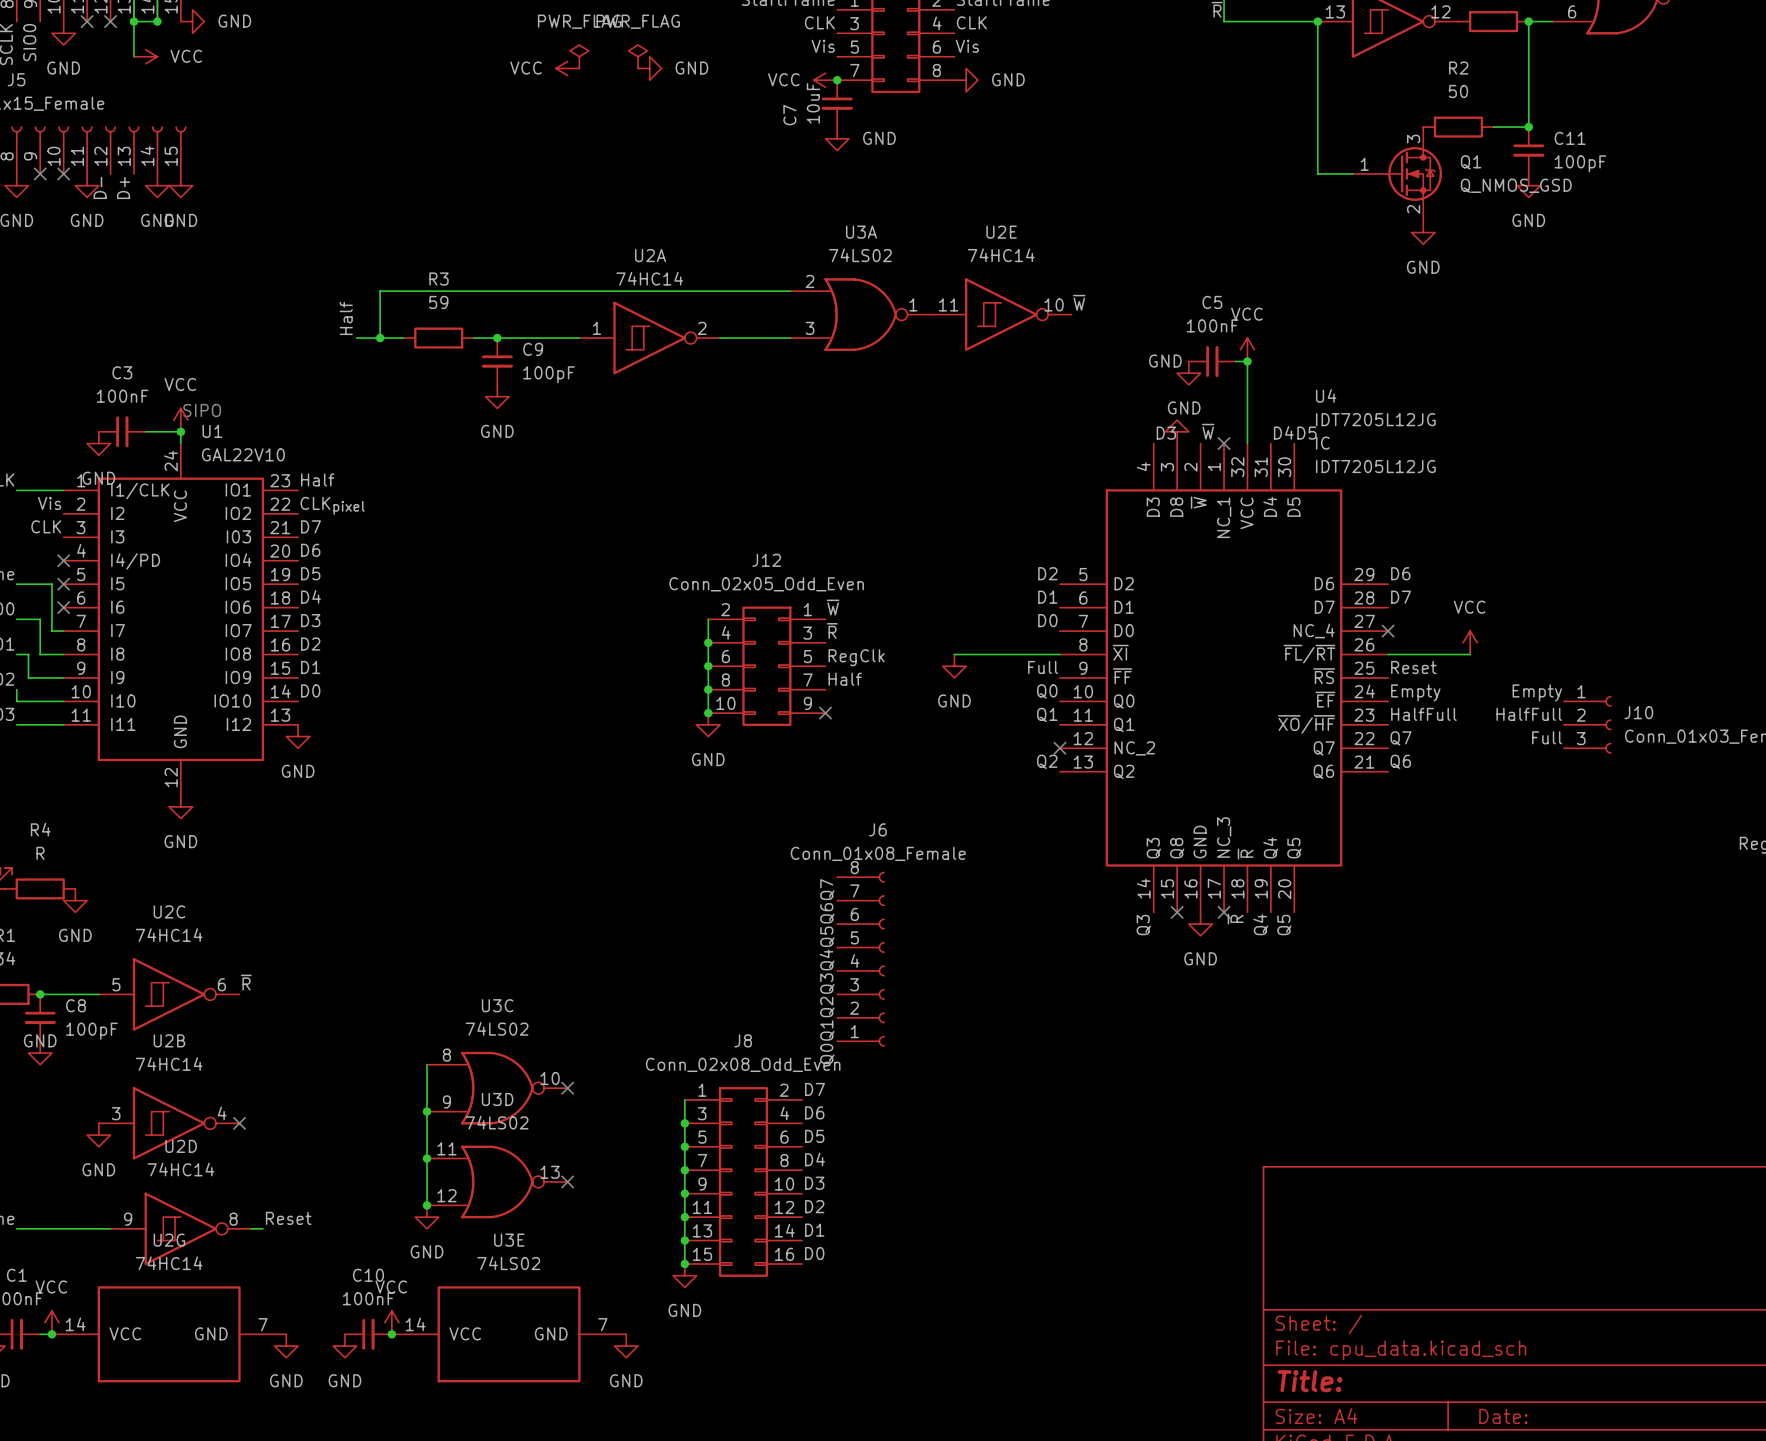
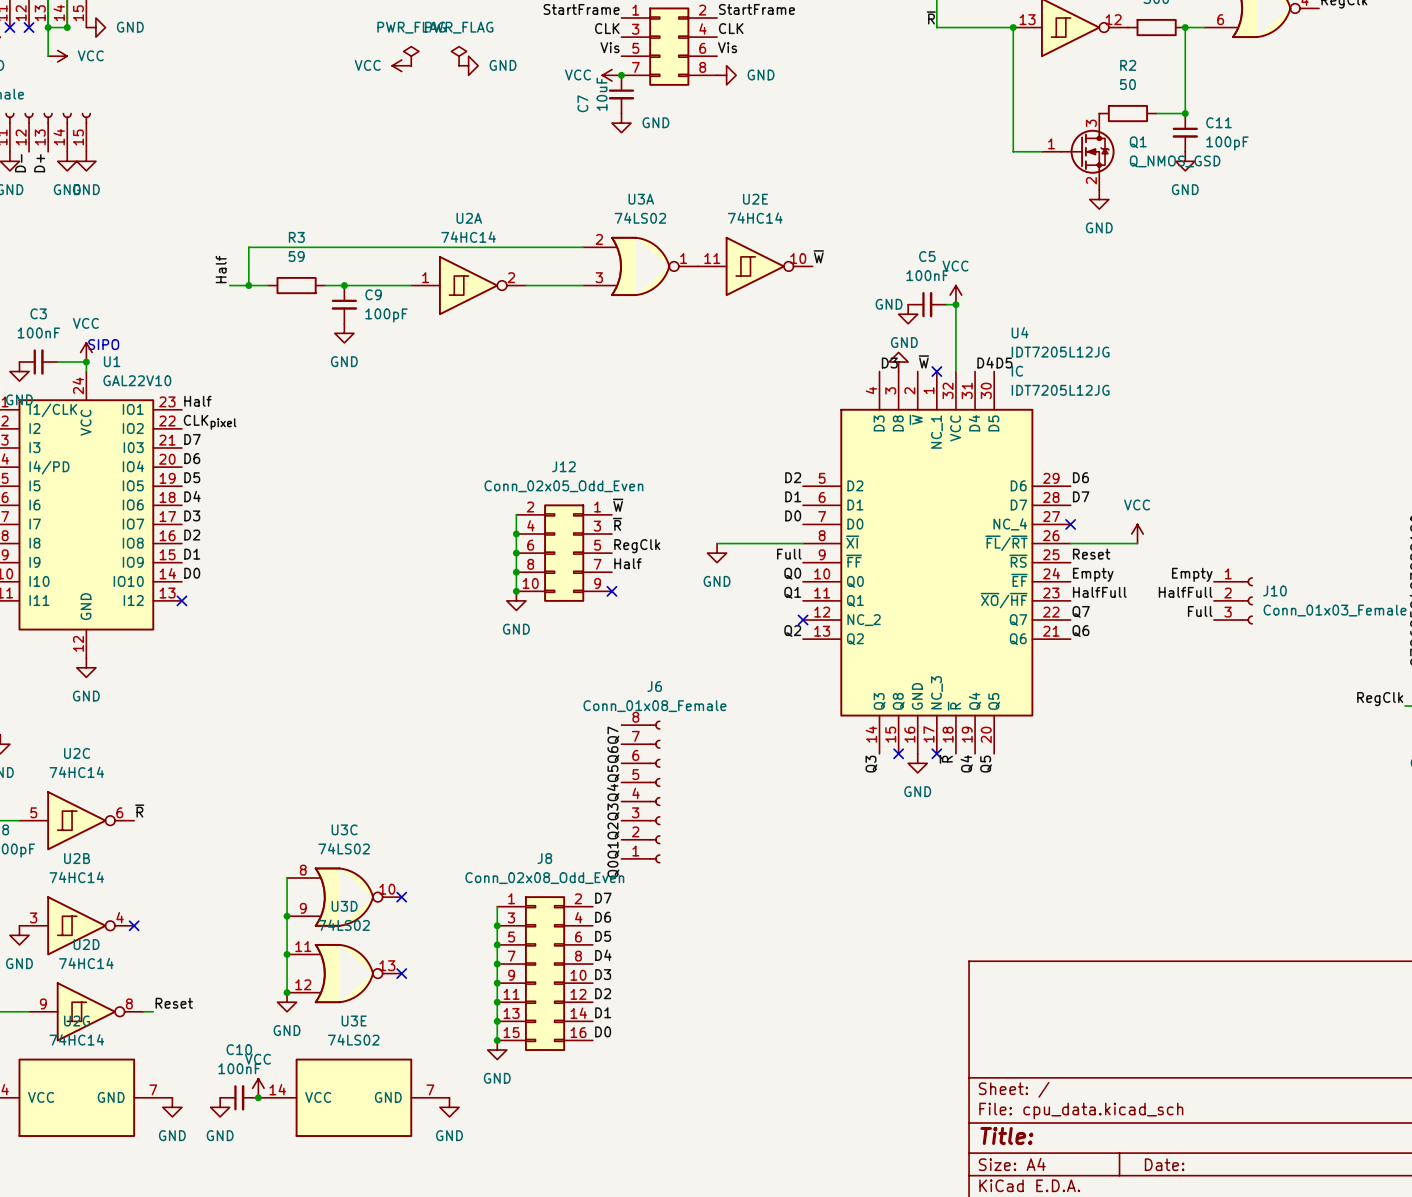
no-connect mark: none -> (181, 600)
power symbol: GND (298, 736) -> none

